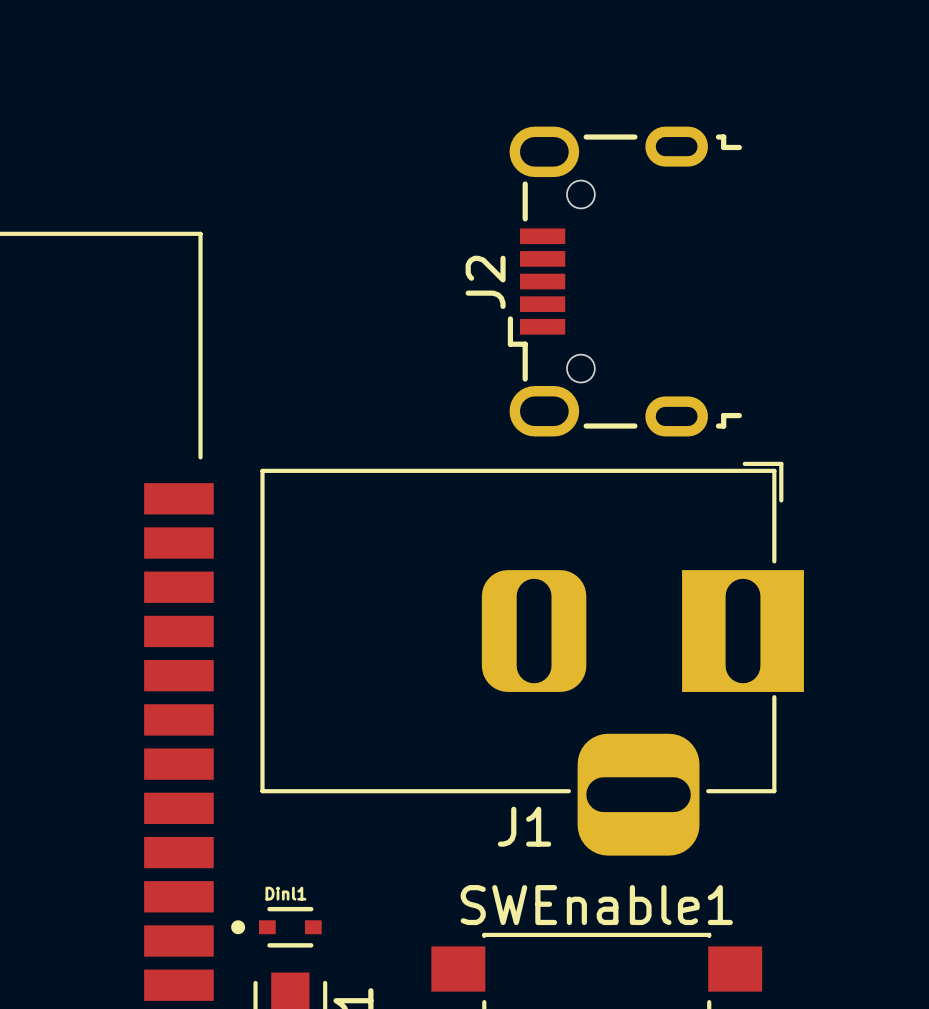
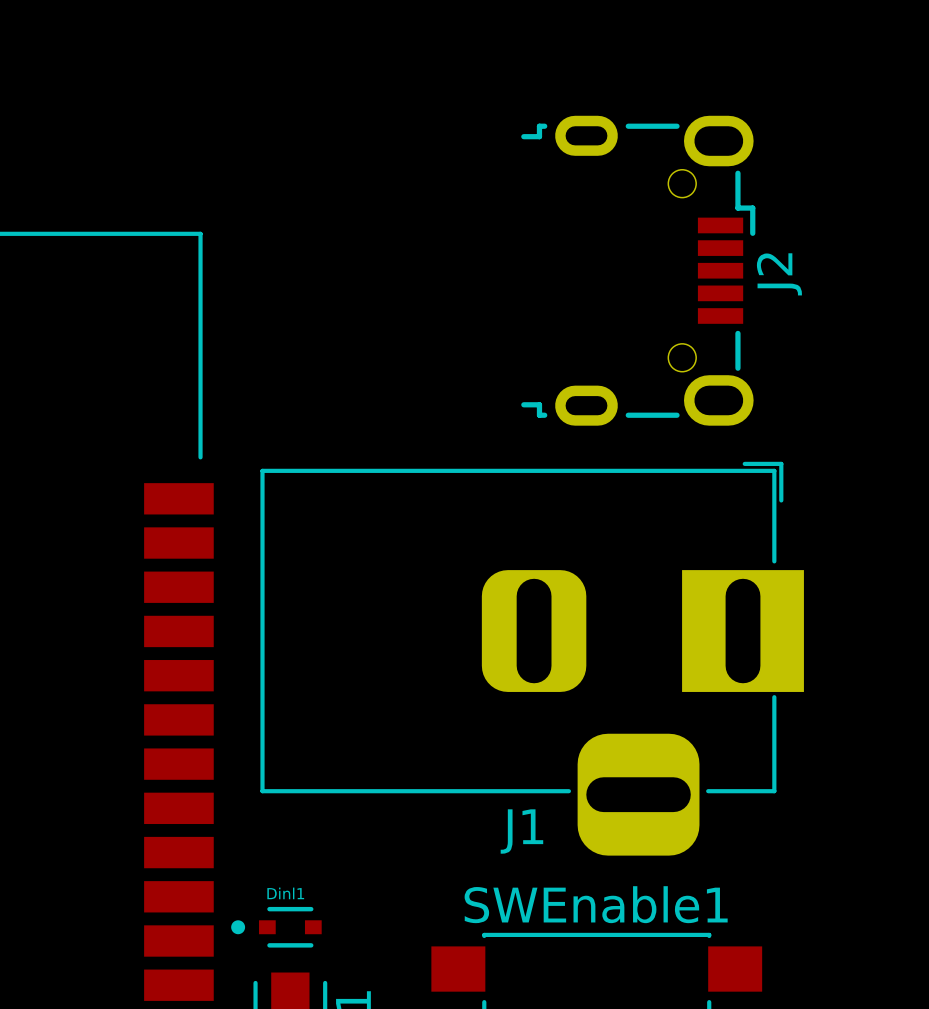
J2 rotation: 0° (624, 281) -> 180° (638, 270)

